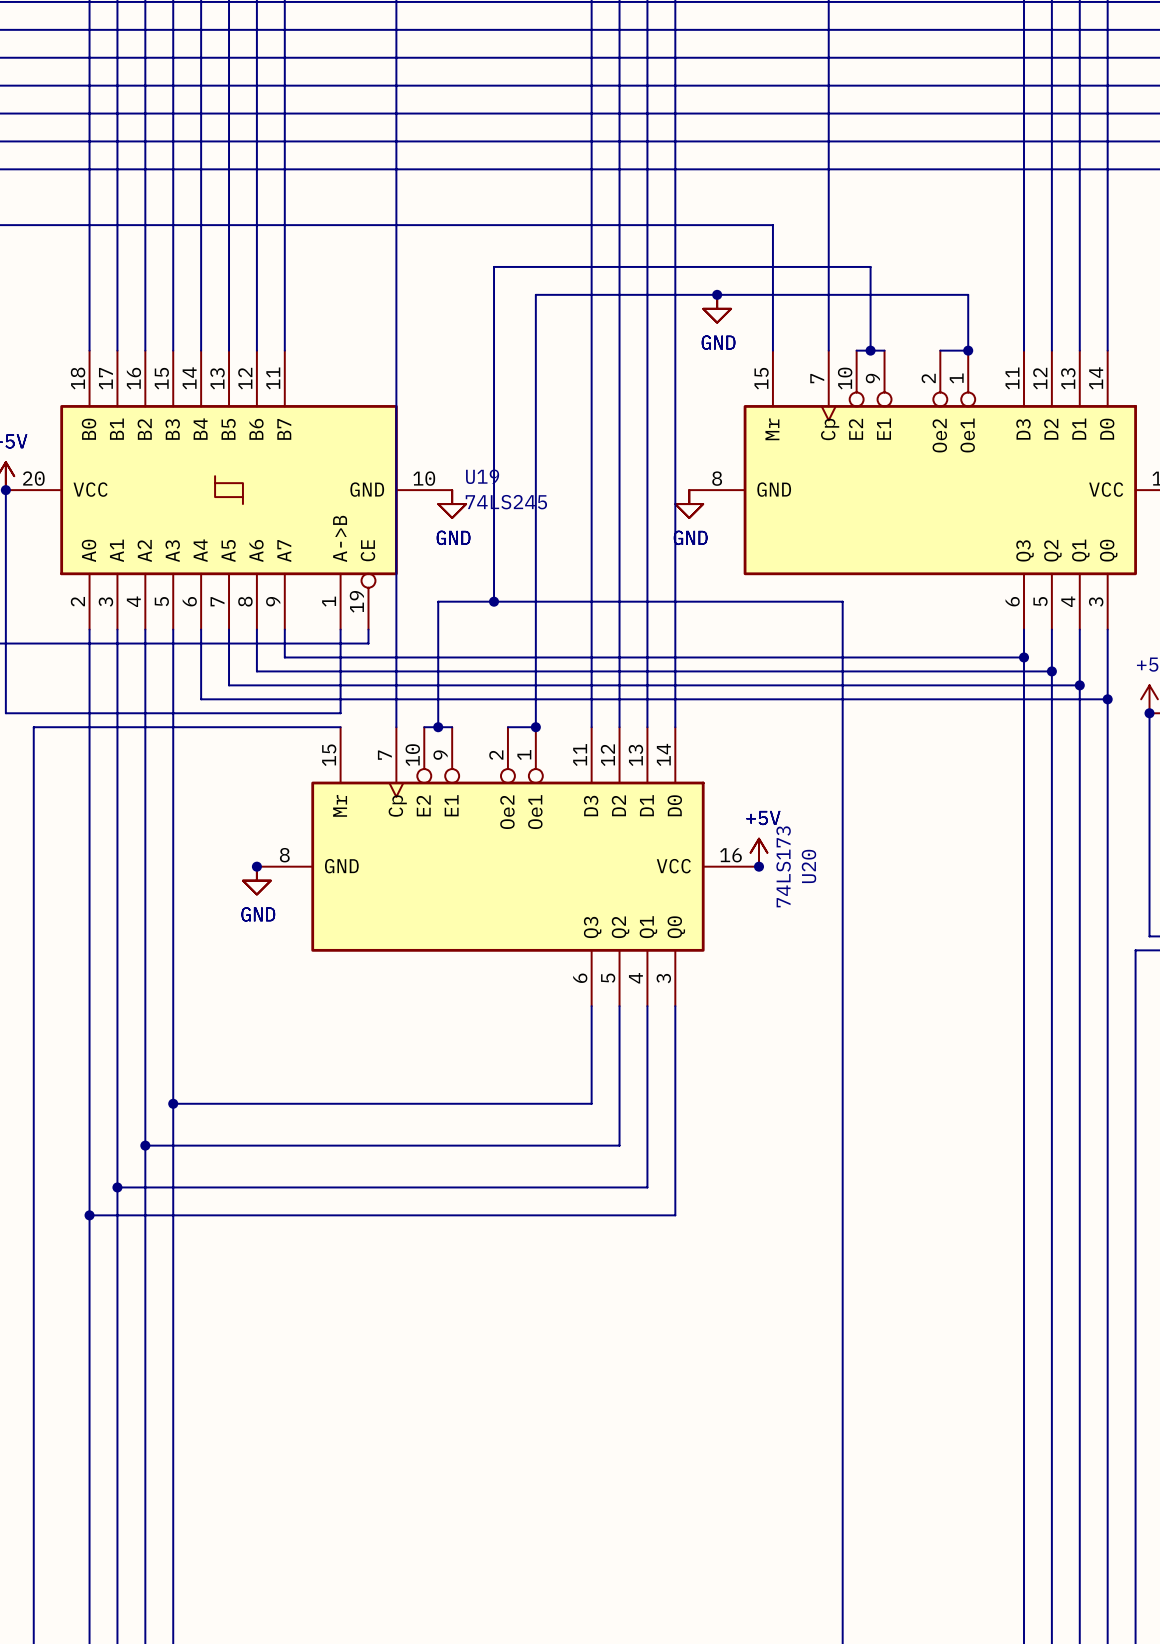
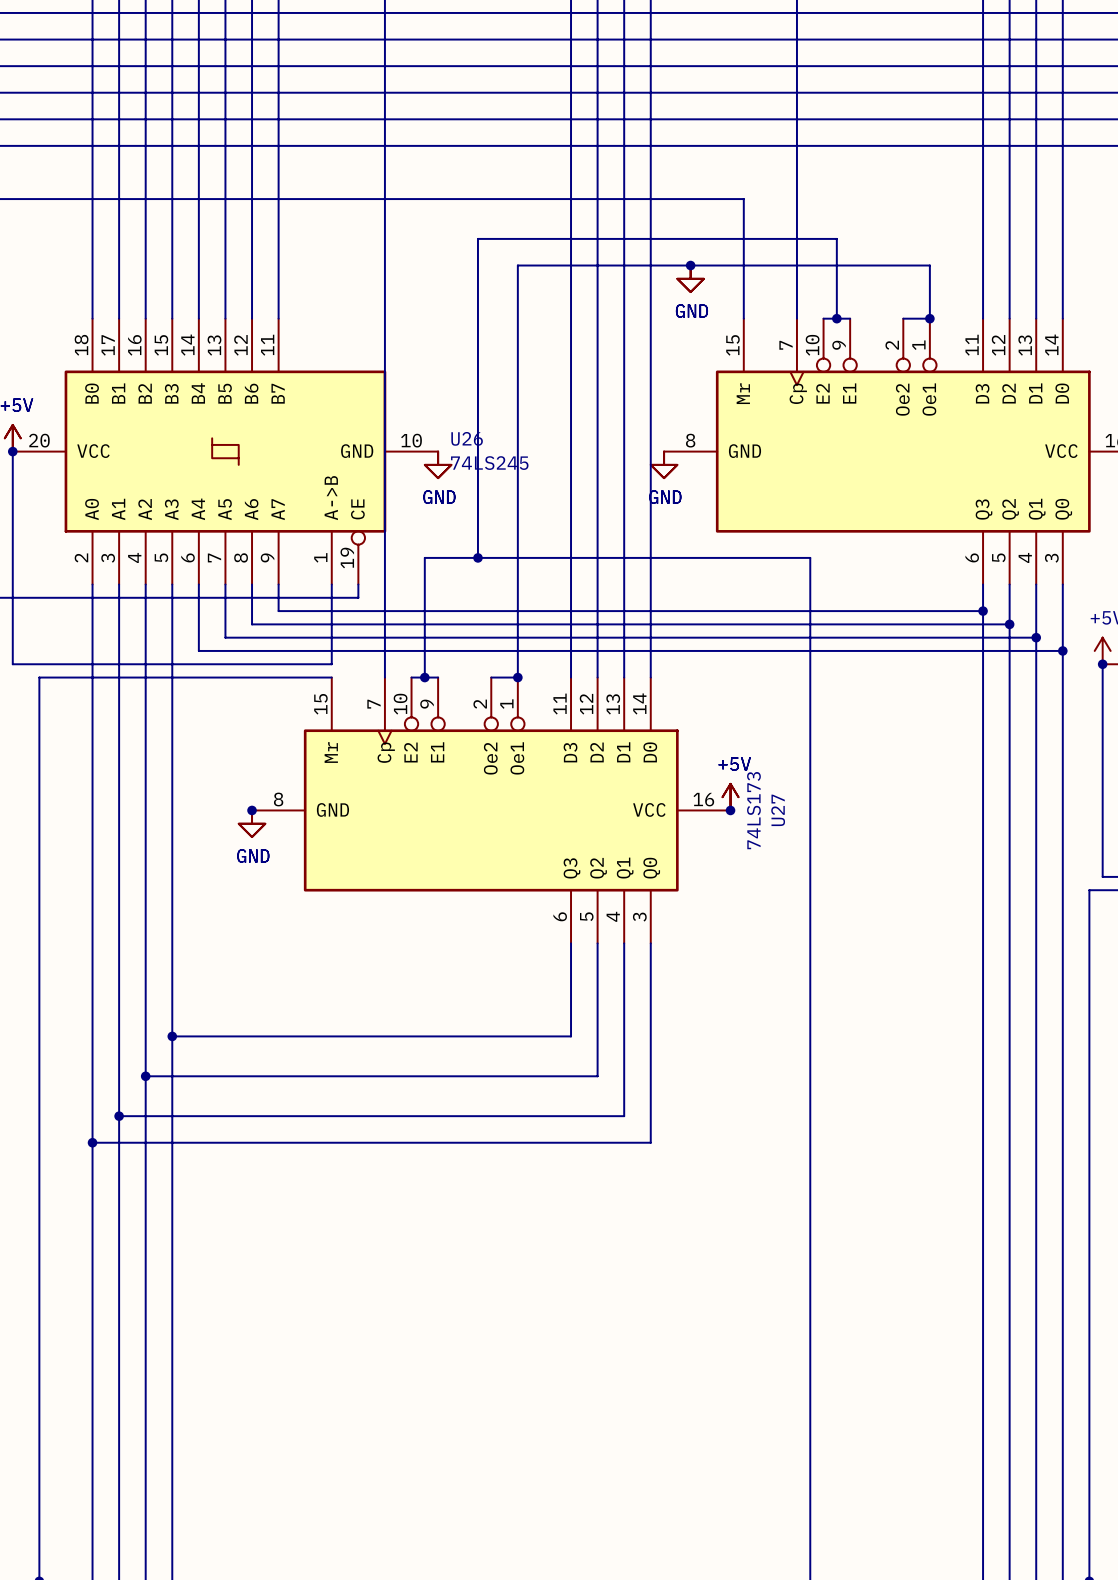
U19 name: U19 (482, 476) -> U26 (467, 438)
U20 name: U20 (808, 866) -> U27 (778, 810)

